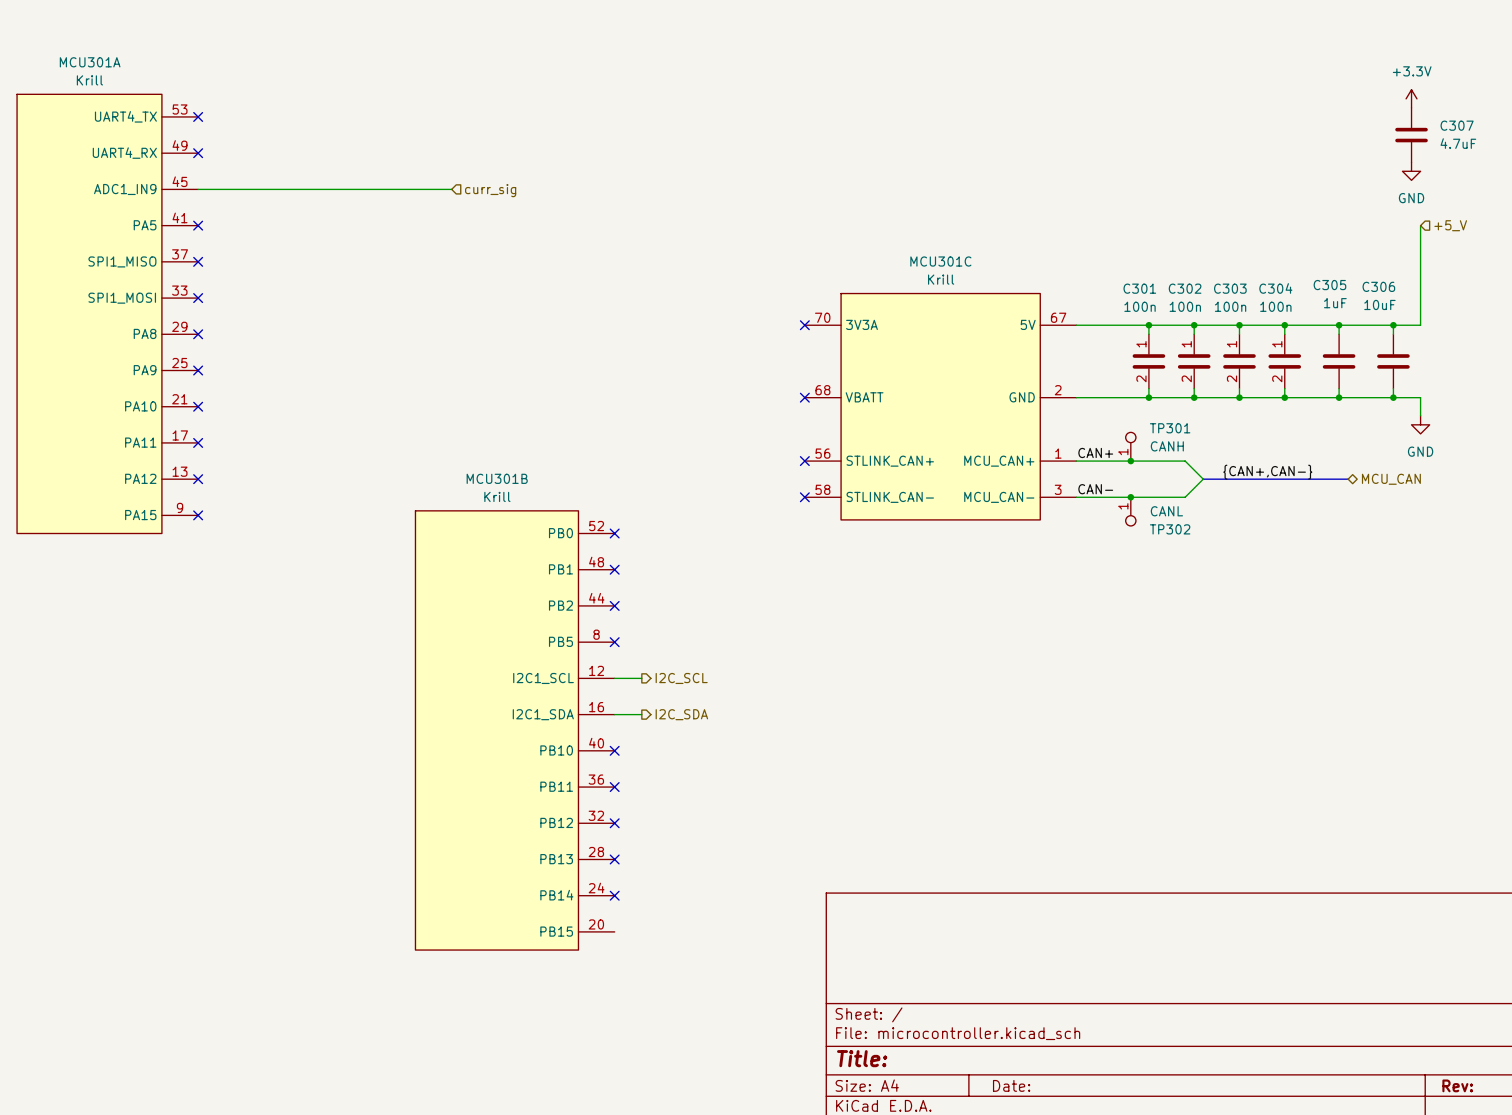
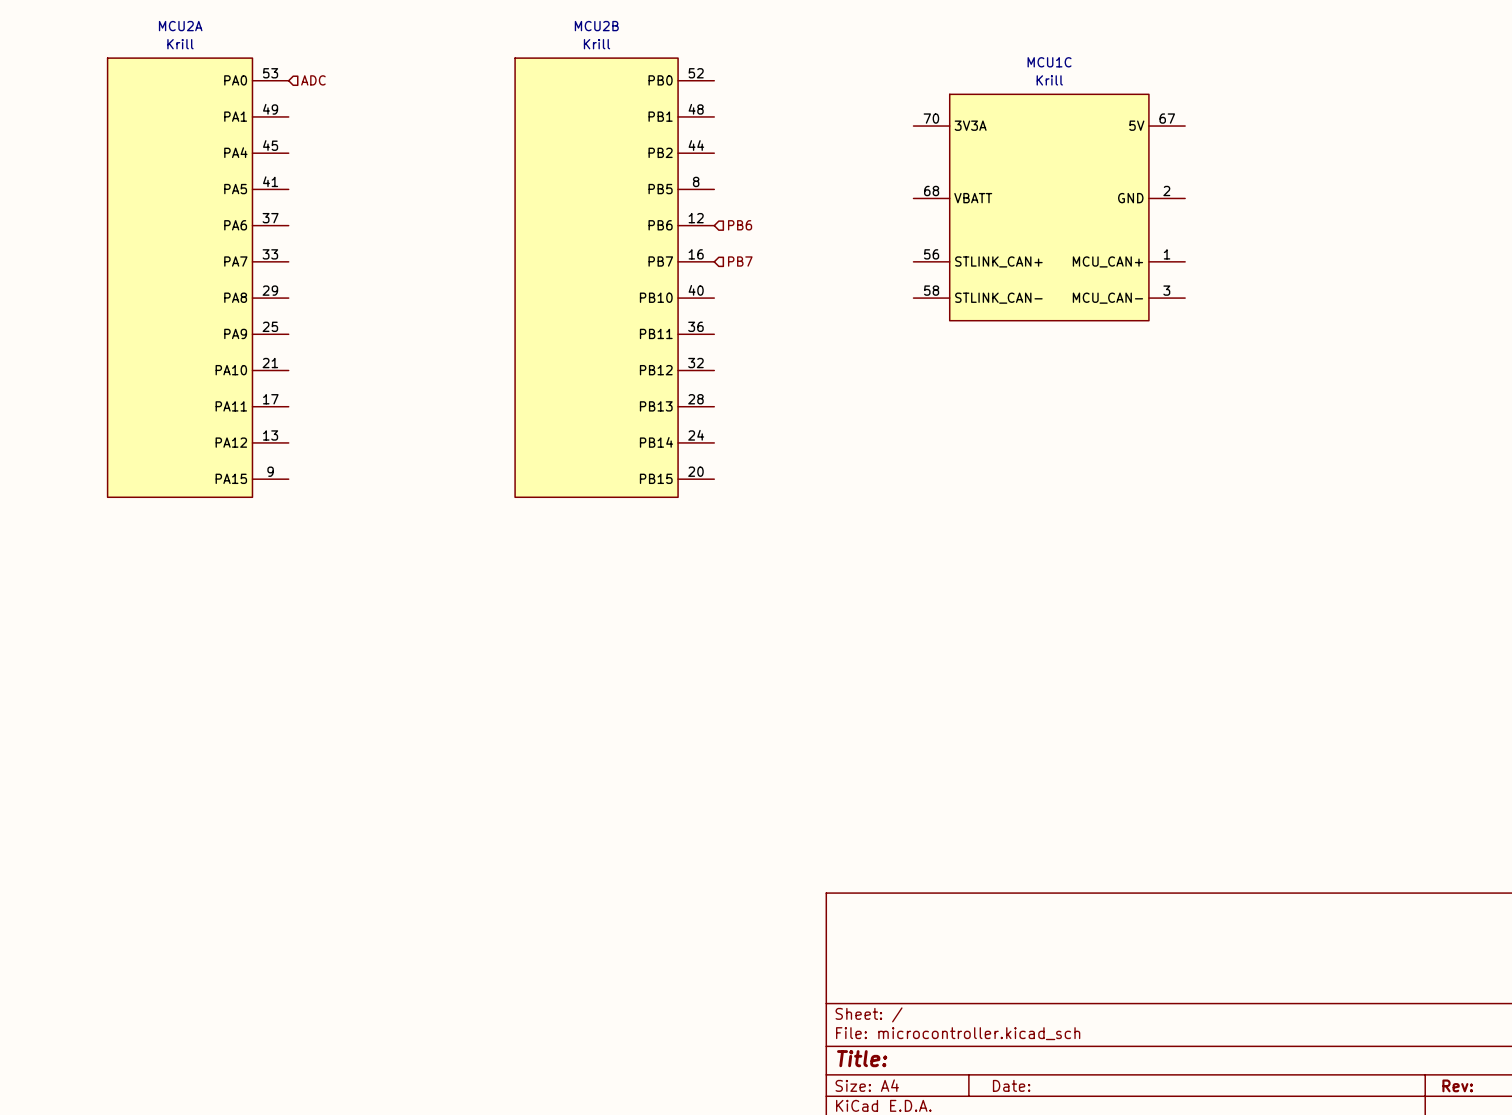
hierarchical label: none -> ADC (313, 80)
power symbol: +3.3V (1411, 98) -> none
no-connect mark: (198, 116) -> none
C307: 4.7uF (1411, 135) -> none
no-connect mark: (198, 153) -> none
power symbol: GND (1411, 171) -> none
wire: (198, 189) (451, 189) -> none
hierarchical label: curr_sig (490, 190) -> none
MCU1C: none -> Krill (1049, 207)
no-connect mark: (198, 225) -> none
hierarchical label: none -> PB6 (740, 225)
wire: (1420, 225) (1420, 325) (1076, 325) -> none
hierarchical label: +5_V (1450, 225) -> none
no-connect mark: (198, 261) -> none
hierarchical label: none -> PB7 (740, 261)
MCU2A: none -> Krill (198, 277)
MCU2B: none -> Krill (614, 277)
no-connect mark: (198, 298) -> none
MCU301A: Krill (107, 313) -> none
no-connect mark: (804, 325) -> none
wire: (1148, 325) (1148, 334) -> none
junction: (1148, 325) -> none
wire: (1194, 325) (1194, 334) -> none
junction: (1194, 325) -> none
wire: (1239, 325) (1239, 334) -> none
junction: (1239, 325) -> none
wire: (1284, 325) (1284, 334) -> none
junction: (1284, 325) -> none
wire: (1339, 325) (1339, 334) -> none
junction: (1339, 325) -> none
wire: (1393, 325) (1393, 334) -> none
junction: (1393, 325) -> none
no-connect mark: (198, 334) -> none
C301: 100n (1148, 361) -> none
C302: 100n (1194, 361) -> none
C303: 100n (1239, 361) -> none
C304: 100n (1284, 361) -> none
C305: 1uF (1339, 361) -> none
C306: 10uF (1393, 361) -> none
no-connect mark: (198, 370) -> none
wire: (1148, 388) (1148, 397) -> none
wire: (1194, 388) (1194, 397) -> none
wire: (1239, 388) (1239, 397) -> none
wire: (1284, 388) (1284, 397) -> none
wire: (1339, 388) (1339, 397) -> none
wire: (1393, 388) (1393, 397) -> none
no-connect mark: (804, 397) -> none
wire: (1076, 397) (1420, 397) (1420, 415) -> none
junction: (1148, 397) -> none
junction: (1194, 397) -> none
junction: (1239, 397) -> none
junction: (1284, 397) -> none
junction: (1339, 397) -> none
junction: (1393, 397) -> none
no-connect mark: (198, 406) -> none
MCU301C: Krill (940, 406) -> none
power symbol: GND (1420, 424) -> none
no-connect mark: (198, 442) -> none
TP301: CANH (1130, 446) -> none
label: CAN+ (1095, 452) -> none
no-connect mark: (804, 461) -> none
wire: (1076, 461) (1185, 461) (1203, 479) (1185, 497) (1076, 497) -> none
junction: (1130, 461) -> none
label: {CAN+,CAN-} (1267, 472) -> none
no-connect mark: (198, 479) -> none
bus: (1203, 479) (1348, 479) -> none
hierarchical label: MCU_CAN (1391, 479) -> none
label: CAN- (1095, 489) -> none
no-connect mark: (804, 497) -> none
junction: (1130, 497) -> none
TP302: CANL (1130, 511) -> none
no-connect mark: (198, 515) -> none
no-connect mark: (614, 533) -> none
no-connect mark: (614, 569) -> none
no-connect mark: (614, 605) -> none
no-connect mark: (614, 642) -> none
wire: (614, 678) (641, 678) -> none
hierarchical label: I2C_SCL (681, 678) -> none
wire: (614, 714) (641, 714) -> none
hierarchical label: I2C_SDA (681, 714) -> none
MCU301B: Krill (515, 730) -> none
no-connect mark: (614, 750) -> none
no-connect mark: (614, 787) -> none
no-connect mark: (614, 823) -> none
no-connect mark: (614, 859) -> none
no-connect mark: (614, 895) -> none

